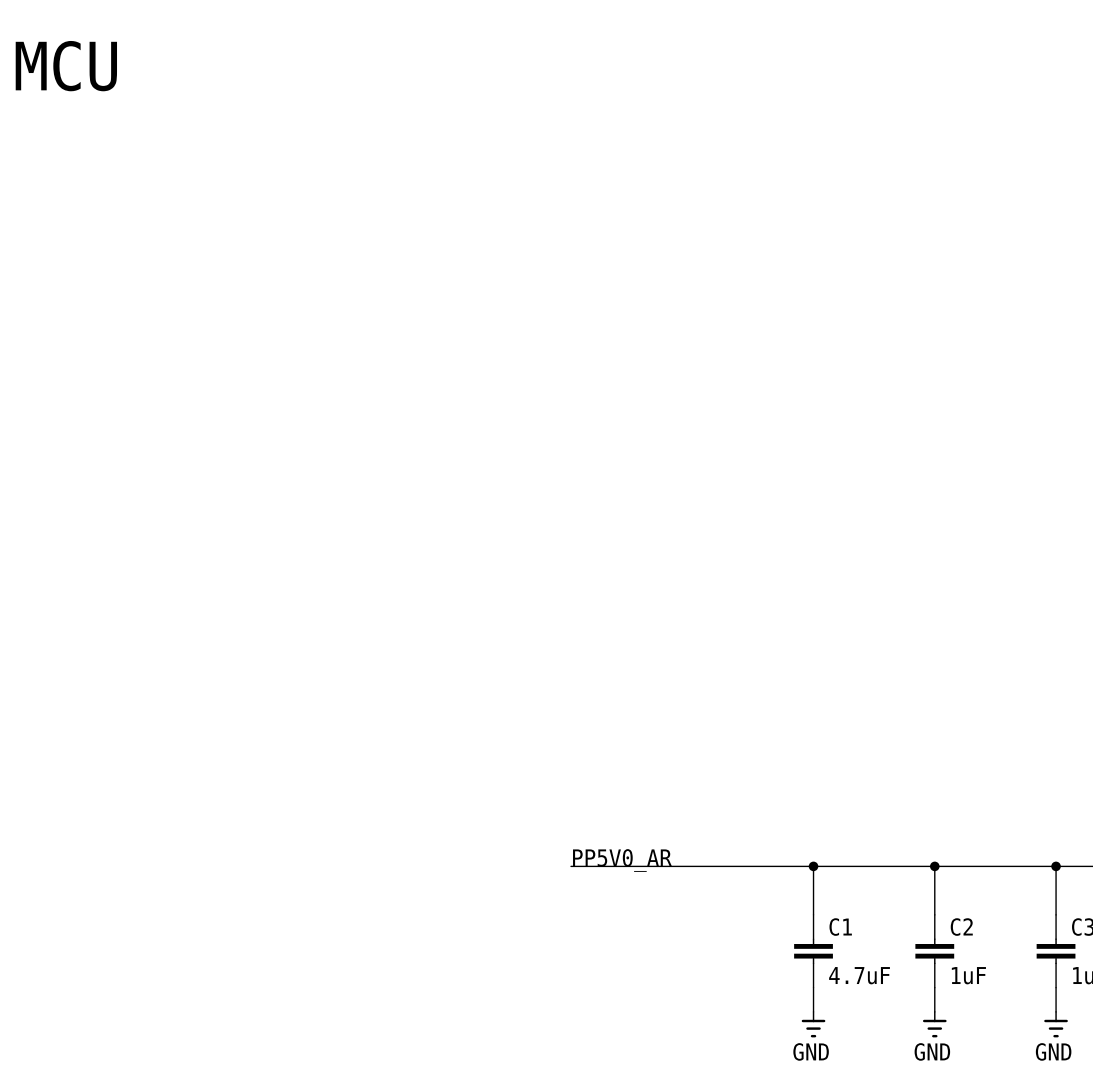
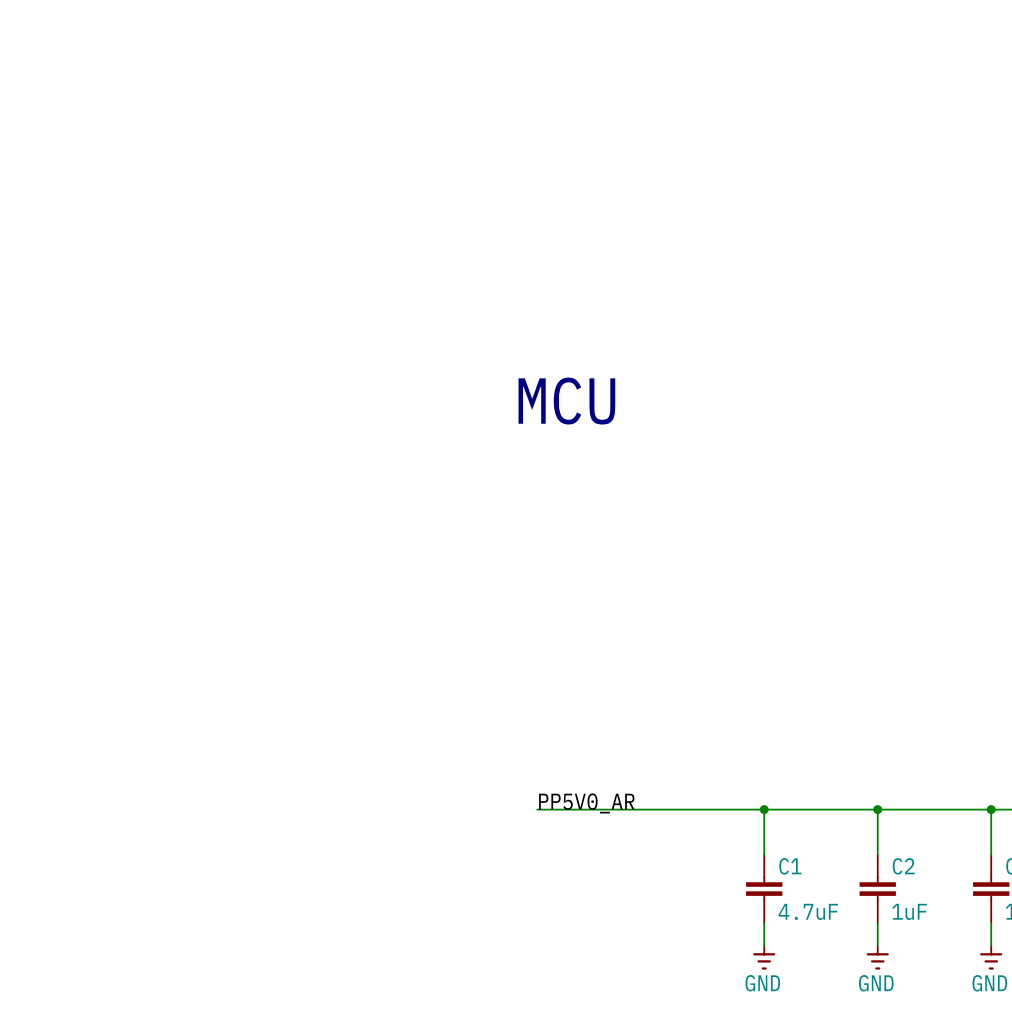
text: MCU (66, 66) -> none
text: none -> MCU (566, 401)

